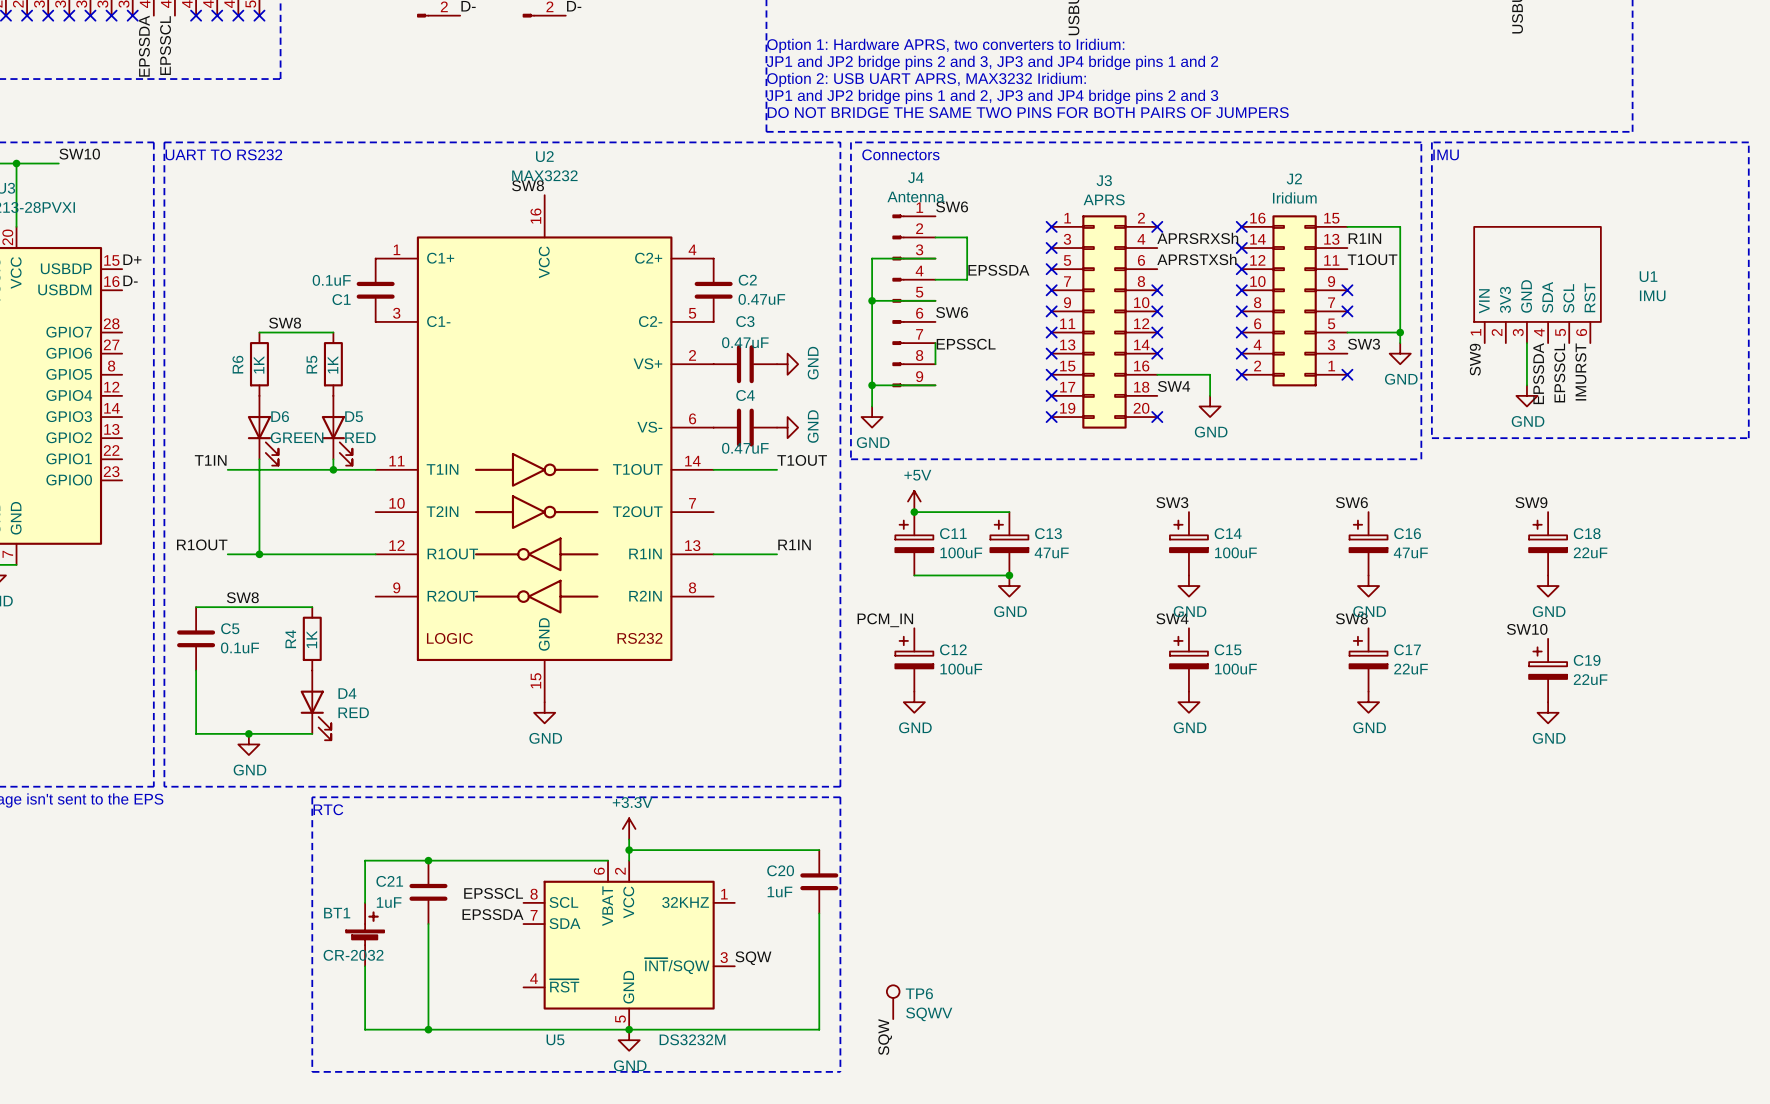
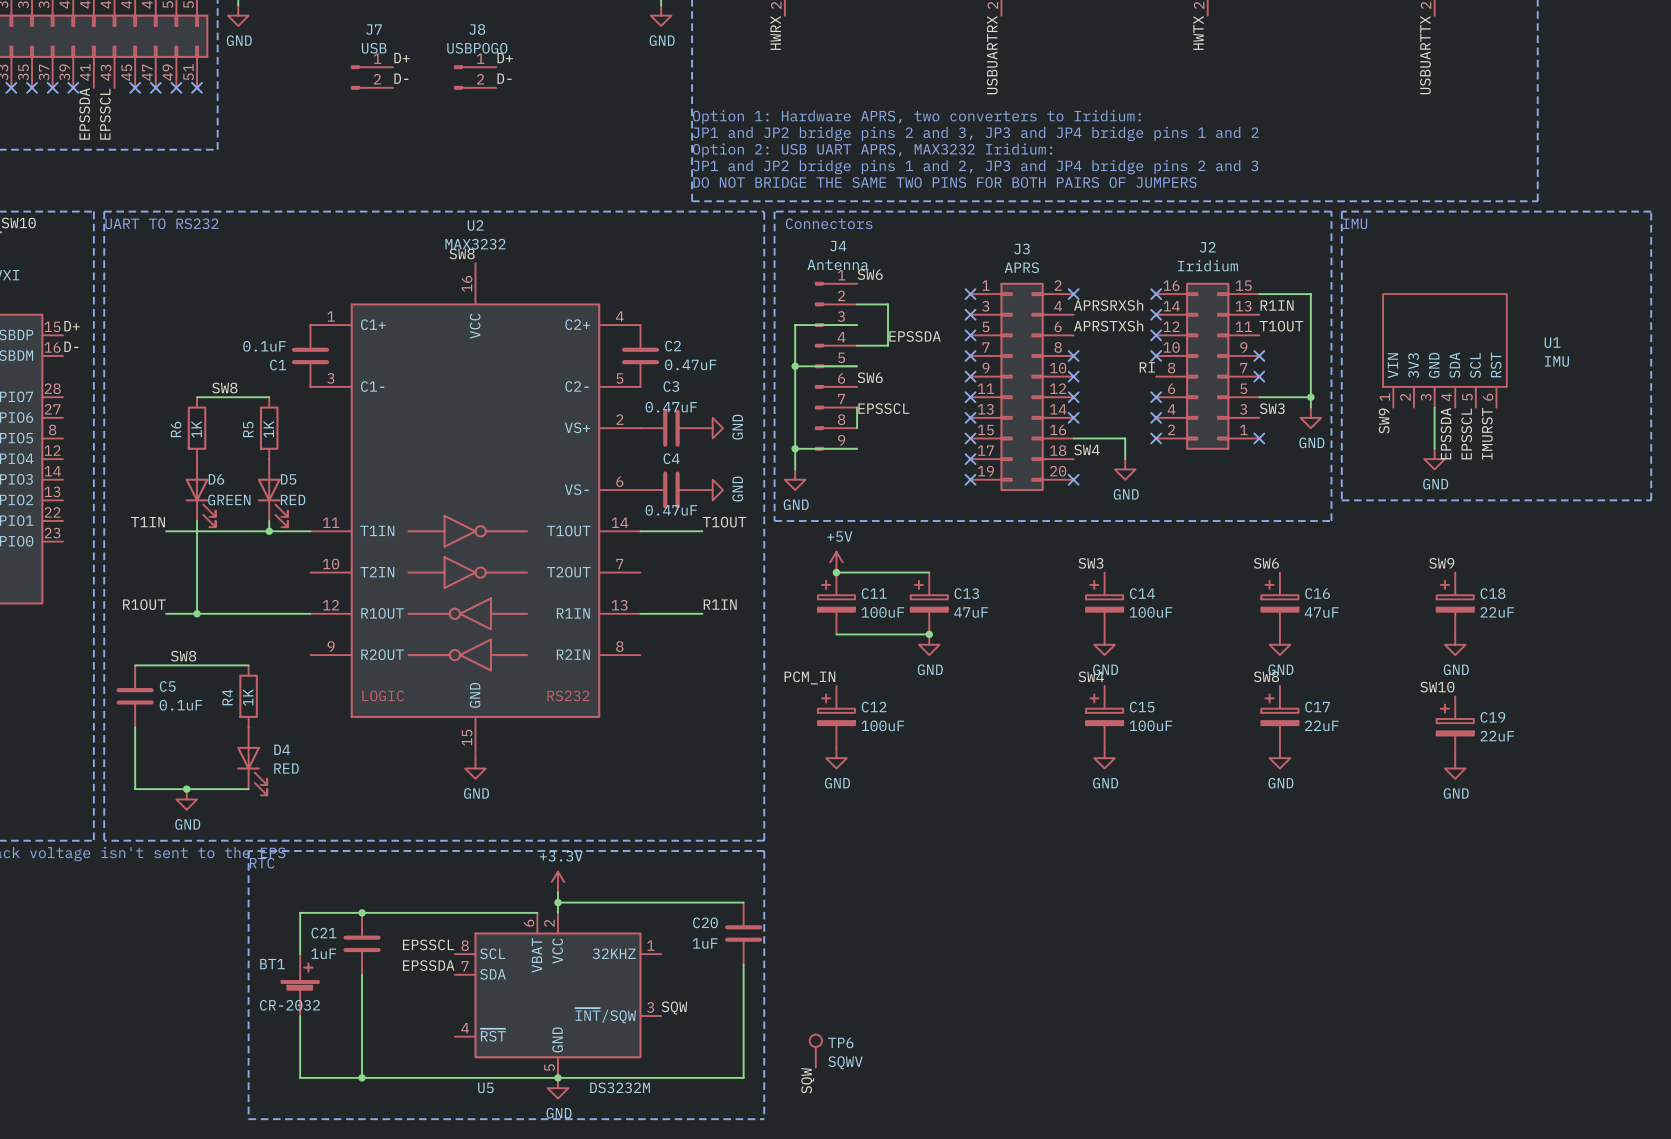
label: none -> RI (1147, 367)
no-connect mark: (1241, 311) -> none

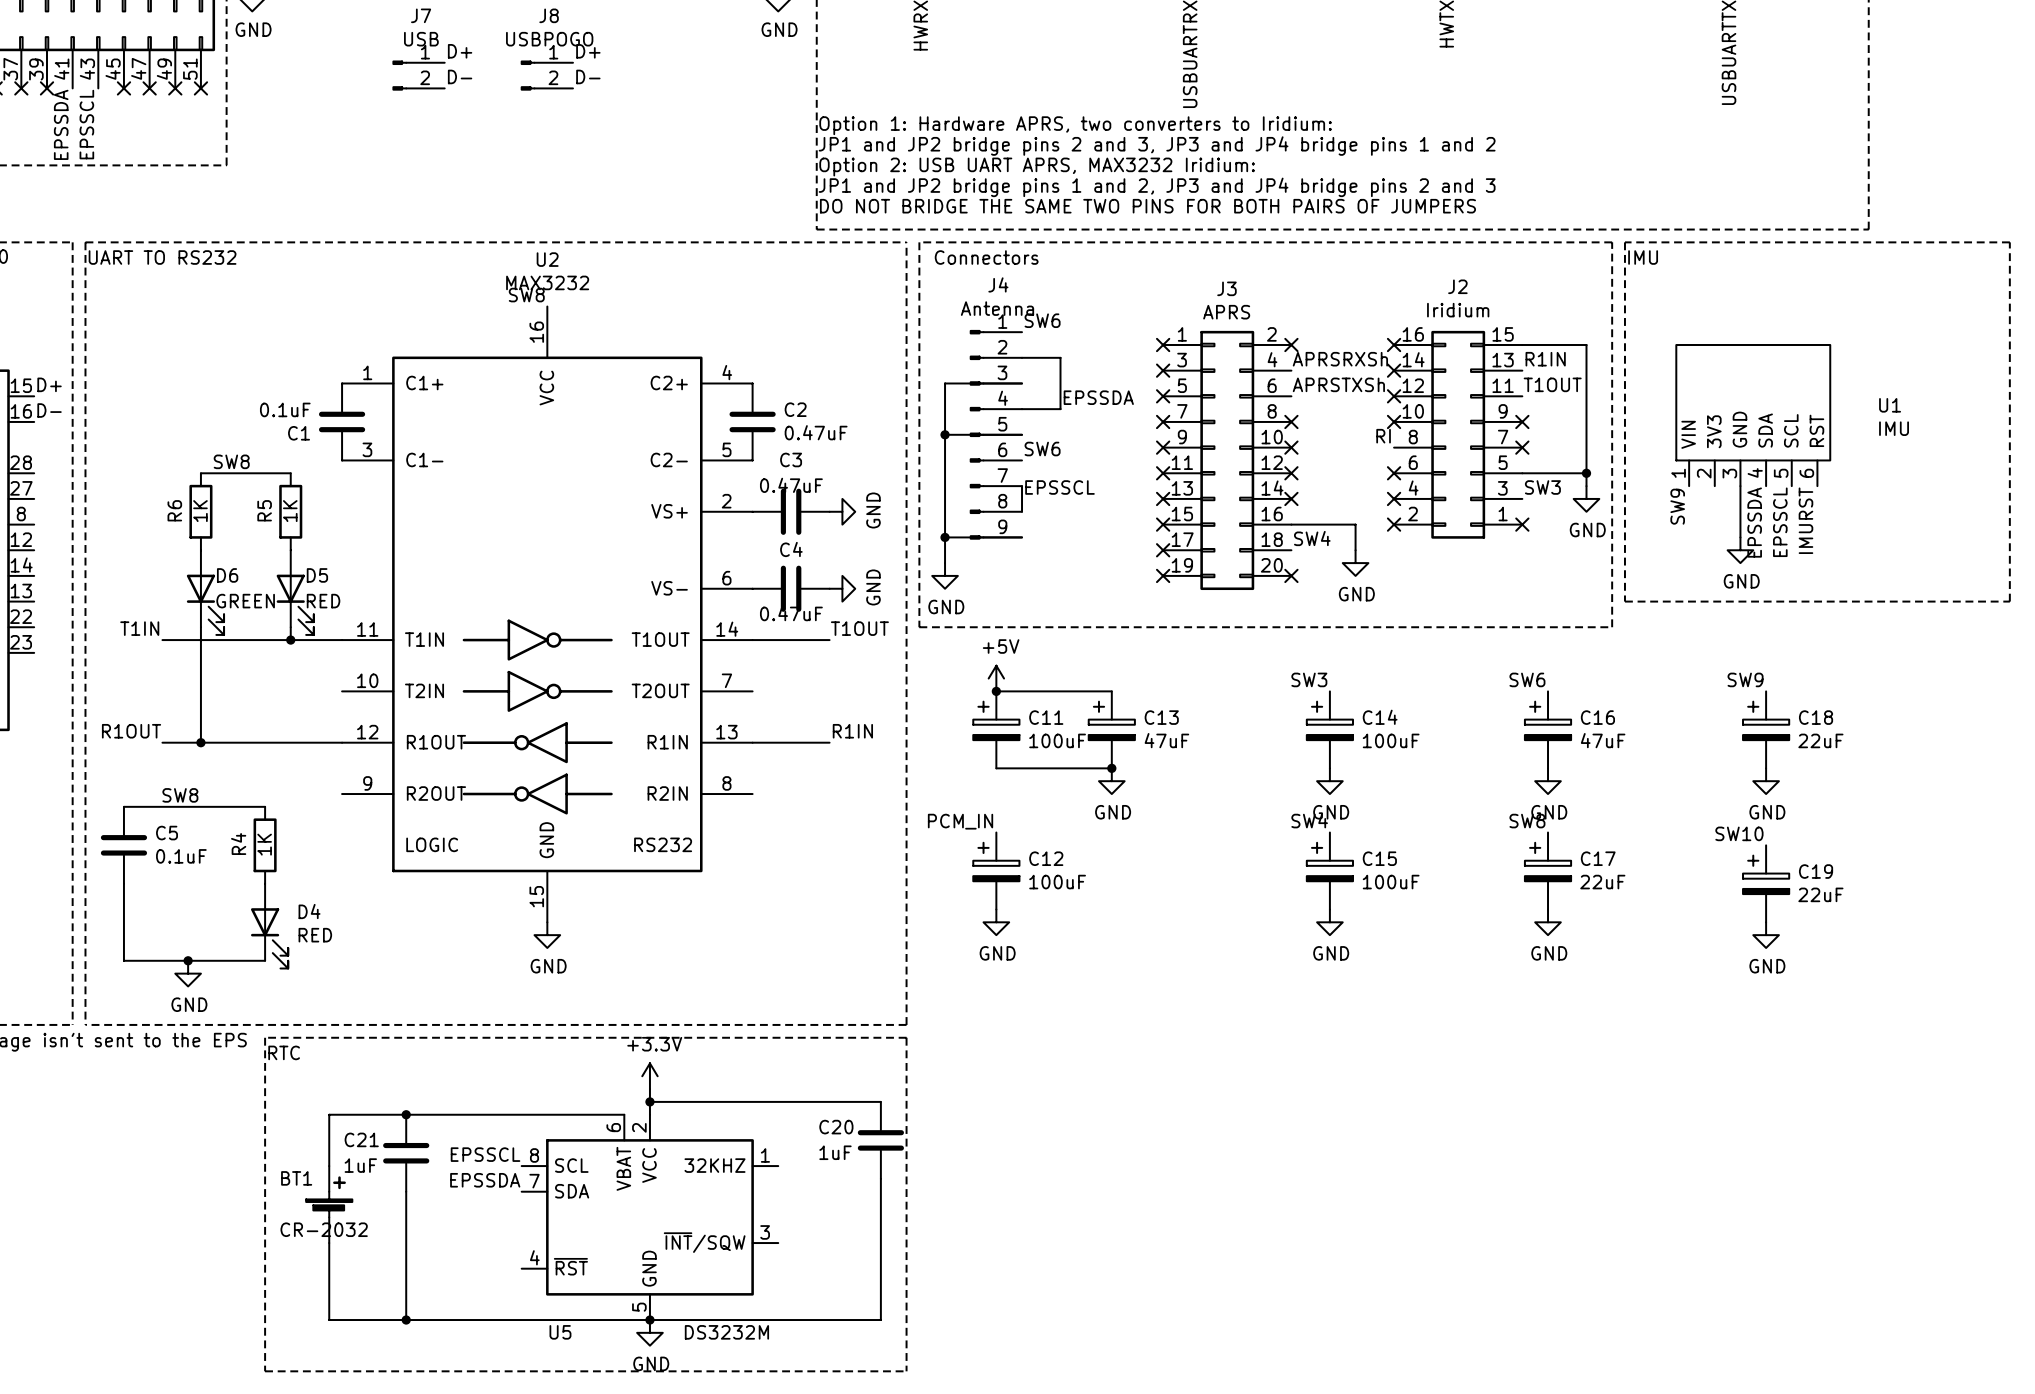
label: SQW (674, 1007) -> none
TP6: SQWV (815, 1051) -> none
label: SQW (807, 1080) -> none

